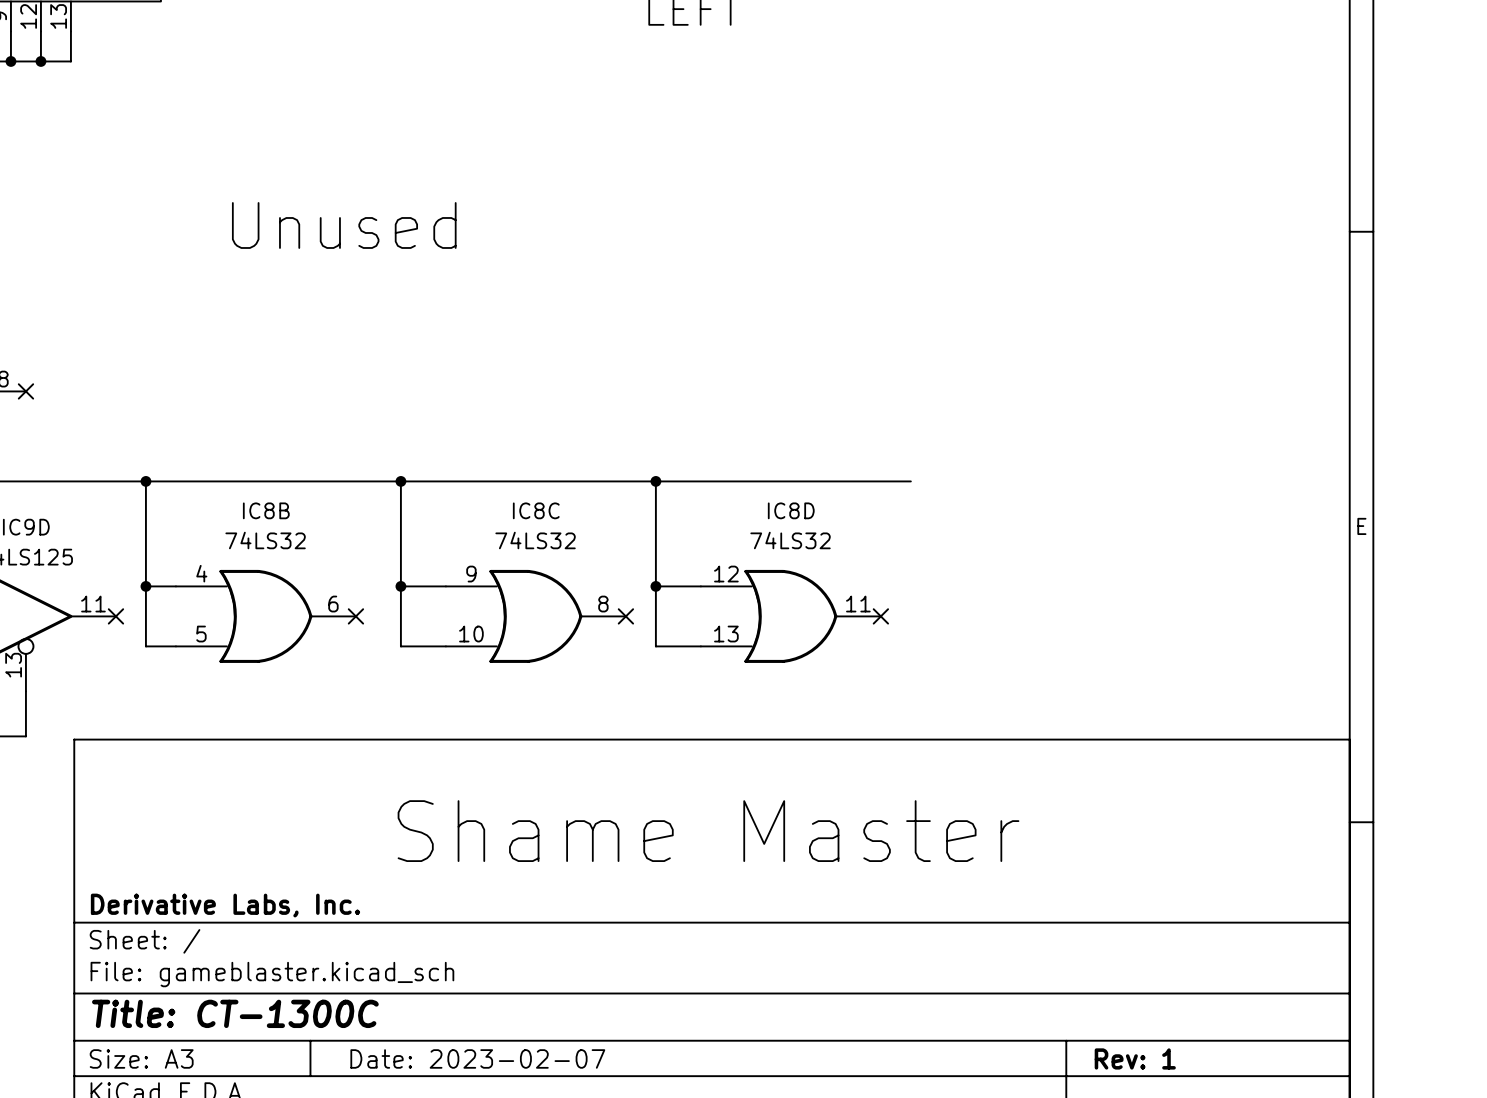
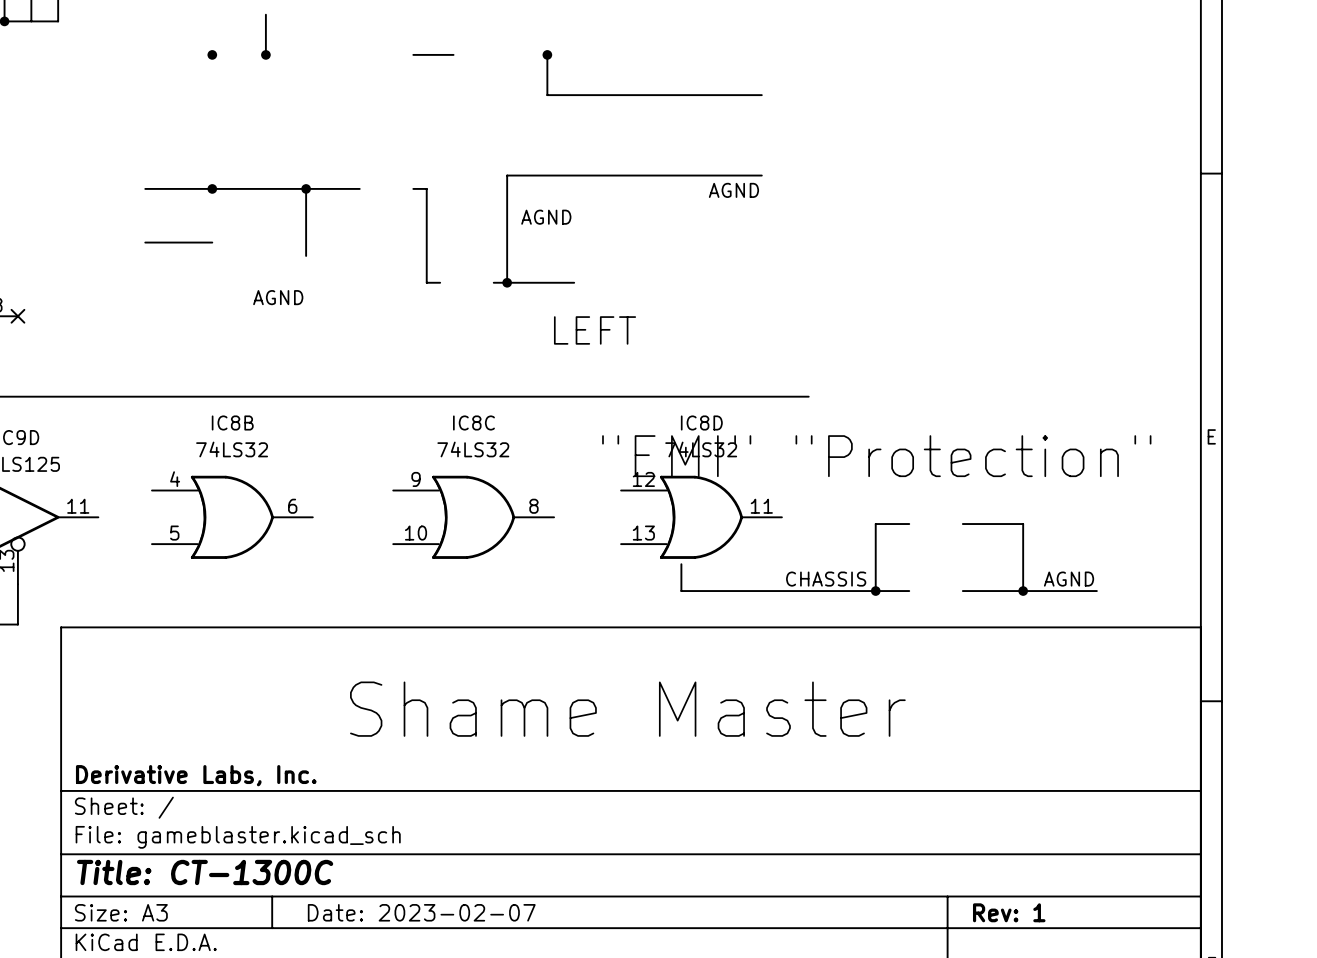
wire: none -> (265, 14) (265, 54)
junction: (40, 61) -> none
junction: none -> (212, 54)
junction: none -> (265, 54)
wire: none -> (413, 54) (453, 54)
wire: none -> (547, 54) (547, 95) (761, 95)
junction: none -> (547, 54)
text: Unused (344, 225) -> none
wire: none -> (761, 175) (507, 175) (507, 282)
wire: none -> (145, 188) (359, 188)
junction: none -> (212, 188)
wire: none -> (306, 188) (306, 255)
junction: none -> (306, 188)
wire: none -> (413, 188) (426, 188) (426, 282) (440, 282)
label: none -> AGND (733, 190)
label: none -> AGND (546, 217)
wire: none -> (145, 242) (212, 242)
wire: none -> (493, 282) (574, 282)
junction: none -> (507, 282)
label: none -> AGND (278, 297)
text: none -> LEFT (595, 330)
wire: (145, 481) (145, 646) (175, 646) -> none
junction: (145, 481) -> none
wire: (400, 481) (400, 646) (445, 646) -> none
junction: (400, 481) -> none
wire: (655, 481) (655, 646) (700, 646) -> none
junction: (655, 481) -> none
text: none -> "EMI" "Protection" (876, 456)
wire: (145, 586) (175, 586) -> none
junction: (145, 586) -> none
wire: (400, 586) (445, 586) -> none
junction: (400, 586) -> none
wire: (655, 586) (700, 586) -> none
junction: (655, 586) -> none
no-connect mark: (115, 616) -> none
no-connect mark: (355, 616) -> none
no-connect mark: (625, 616) -> none
no-connect mark: (880, 616) -> none
wire: none -> (909, 524) (875, 524) (875, 591)
wire: none -> (962, 524) (1023, 524) (1023, 591)
wire: none -> (681, 564) (681, 591) (909, 591)
label: none -> CHASSIS (826, 579)
label: none -> AGND (1069, 579)
junction: none -> (875, 591)
wire: none -> (962, 591) (1096, 591)
junction: none -> (1023, 591)

